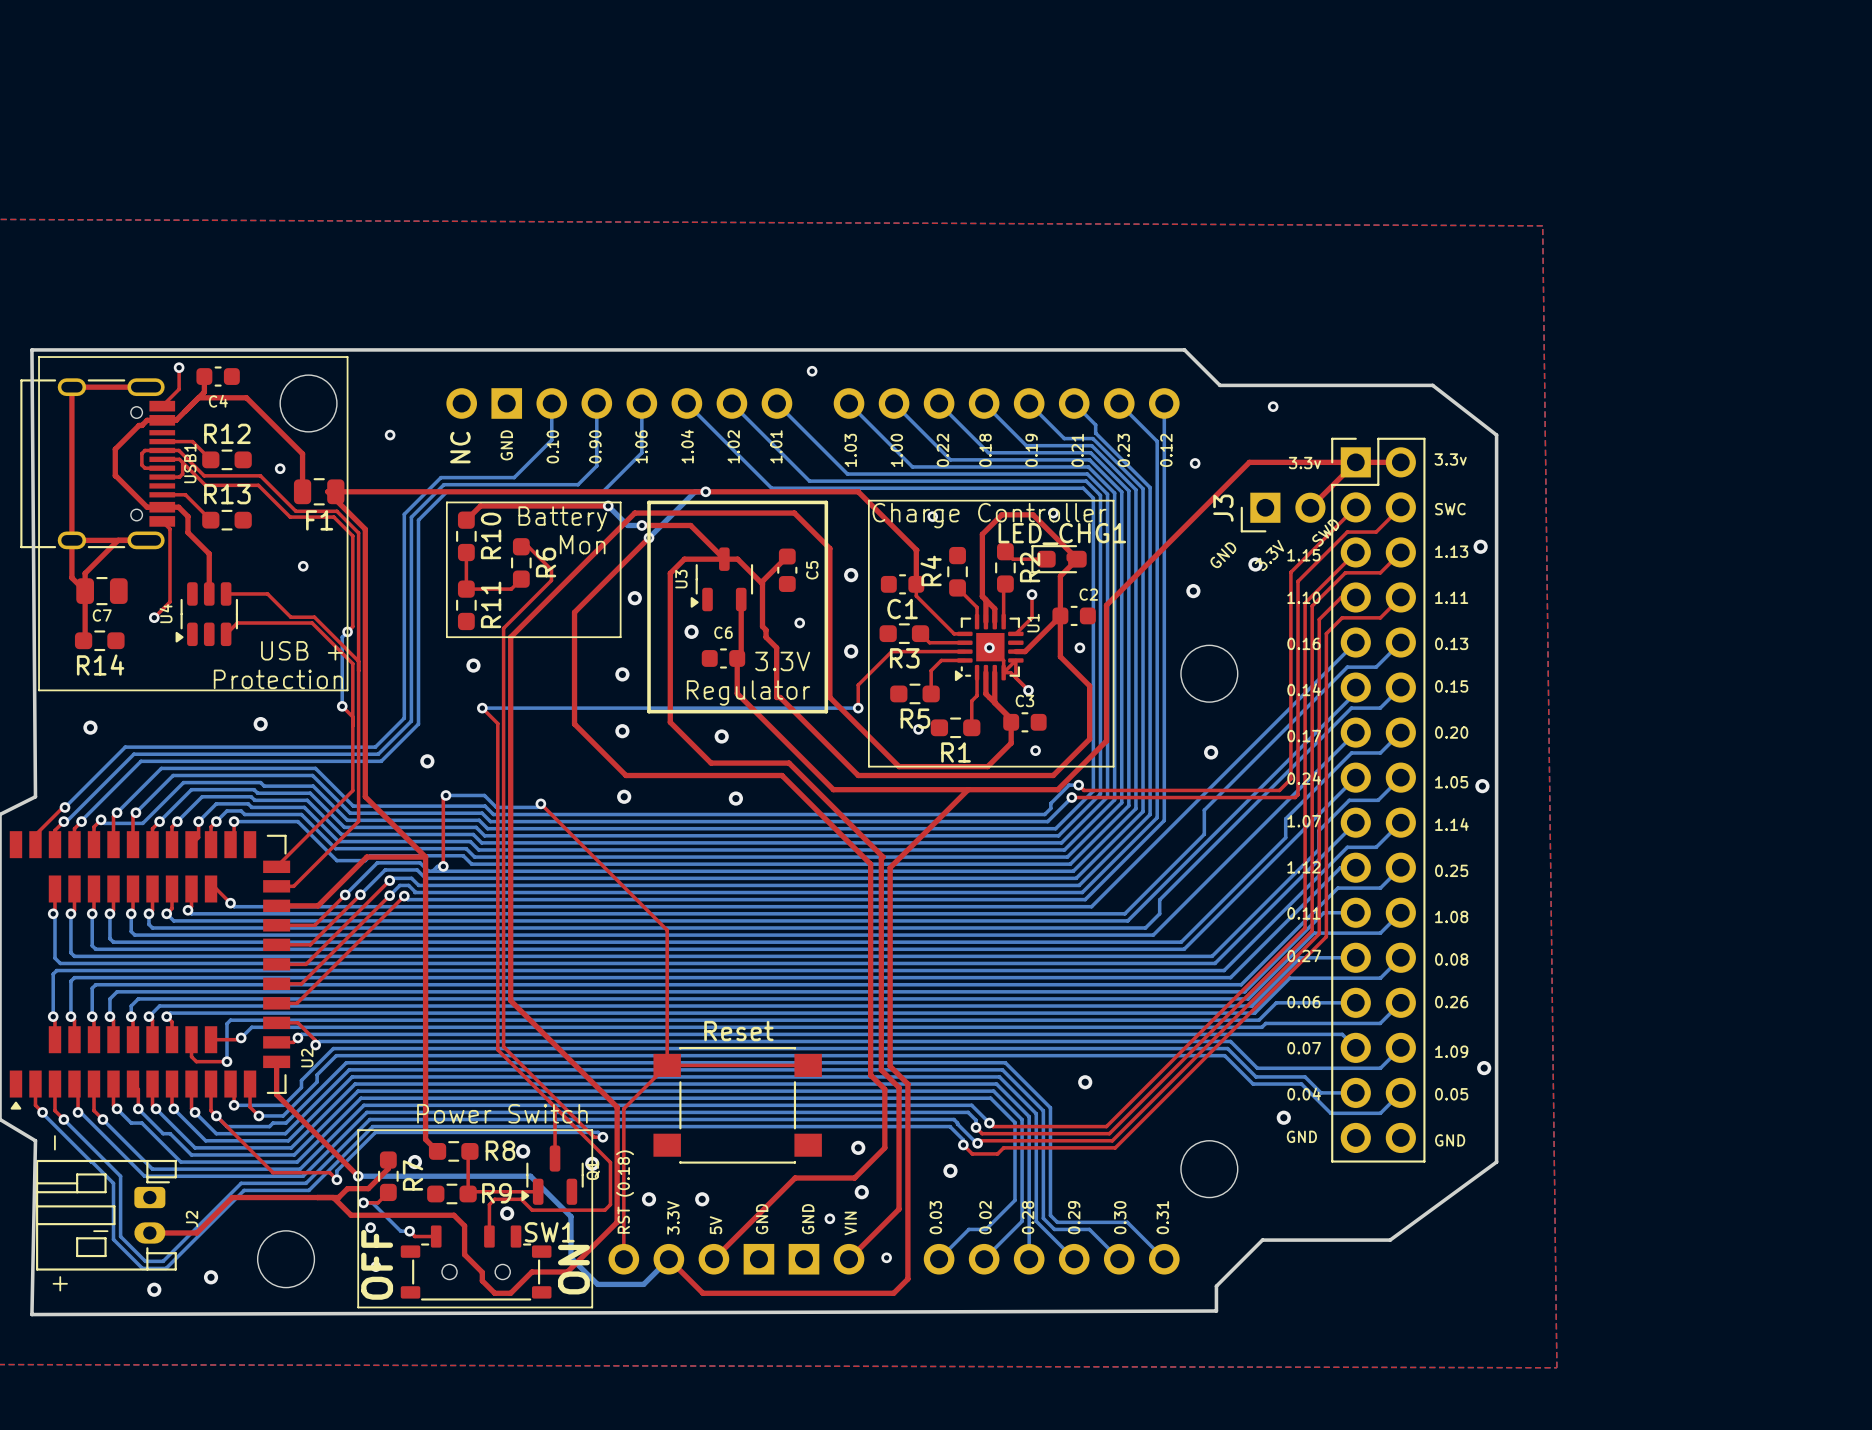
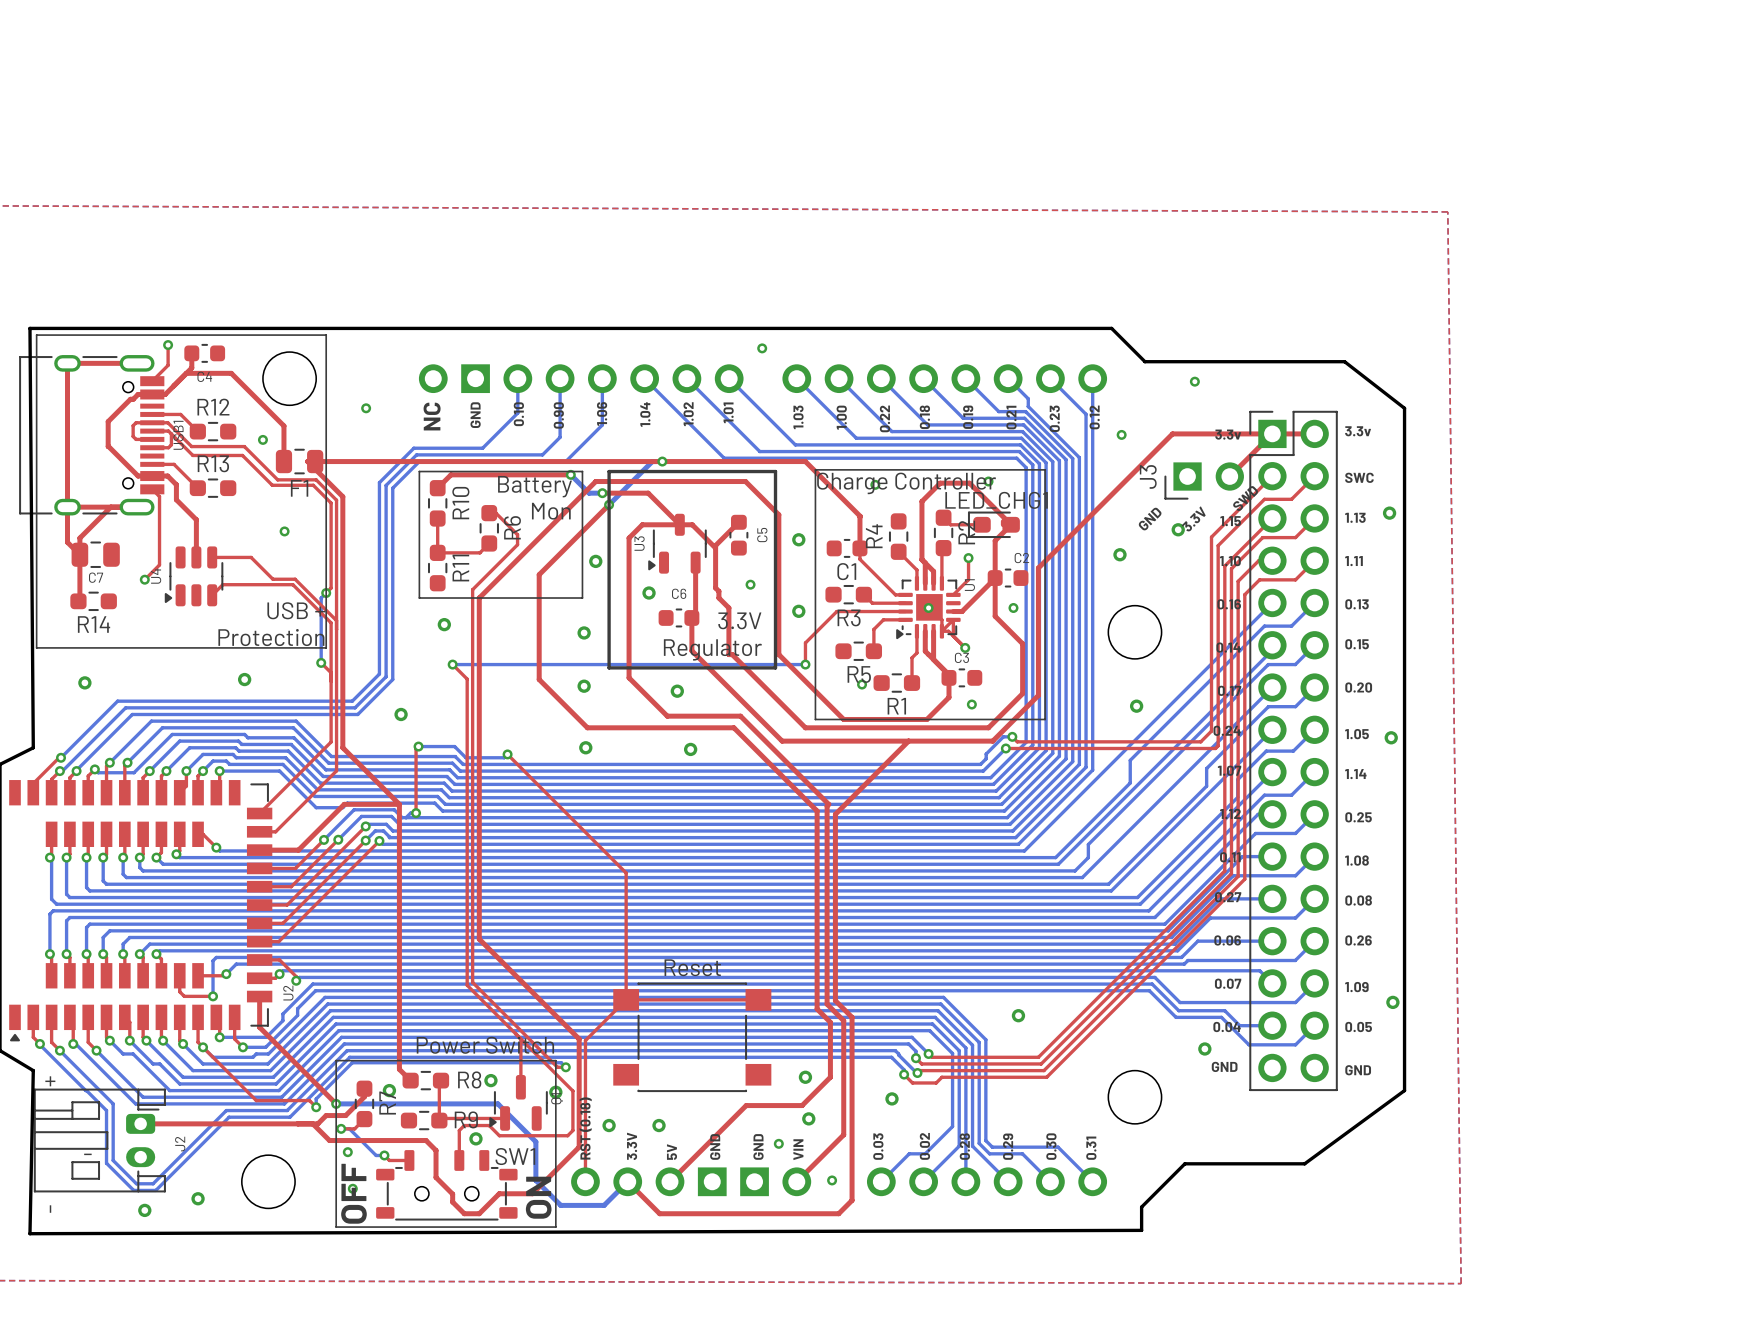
text: - (54, 1142) -> + (50, 1081)
top track: (232, 1197) (196, 1232) (149, 1232) -> (218, 1123) (140, 1123)
text: + (60, 1283) -> - (50, 1209)

